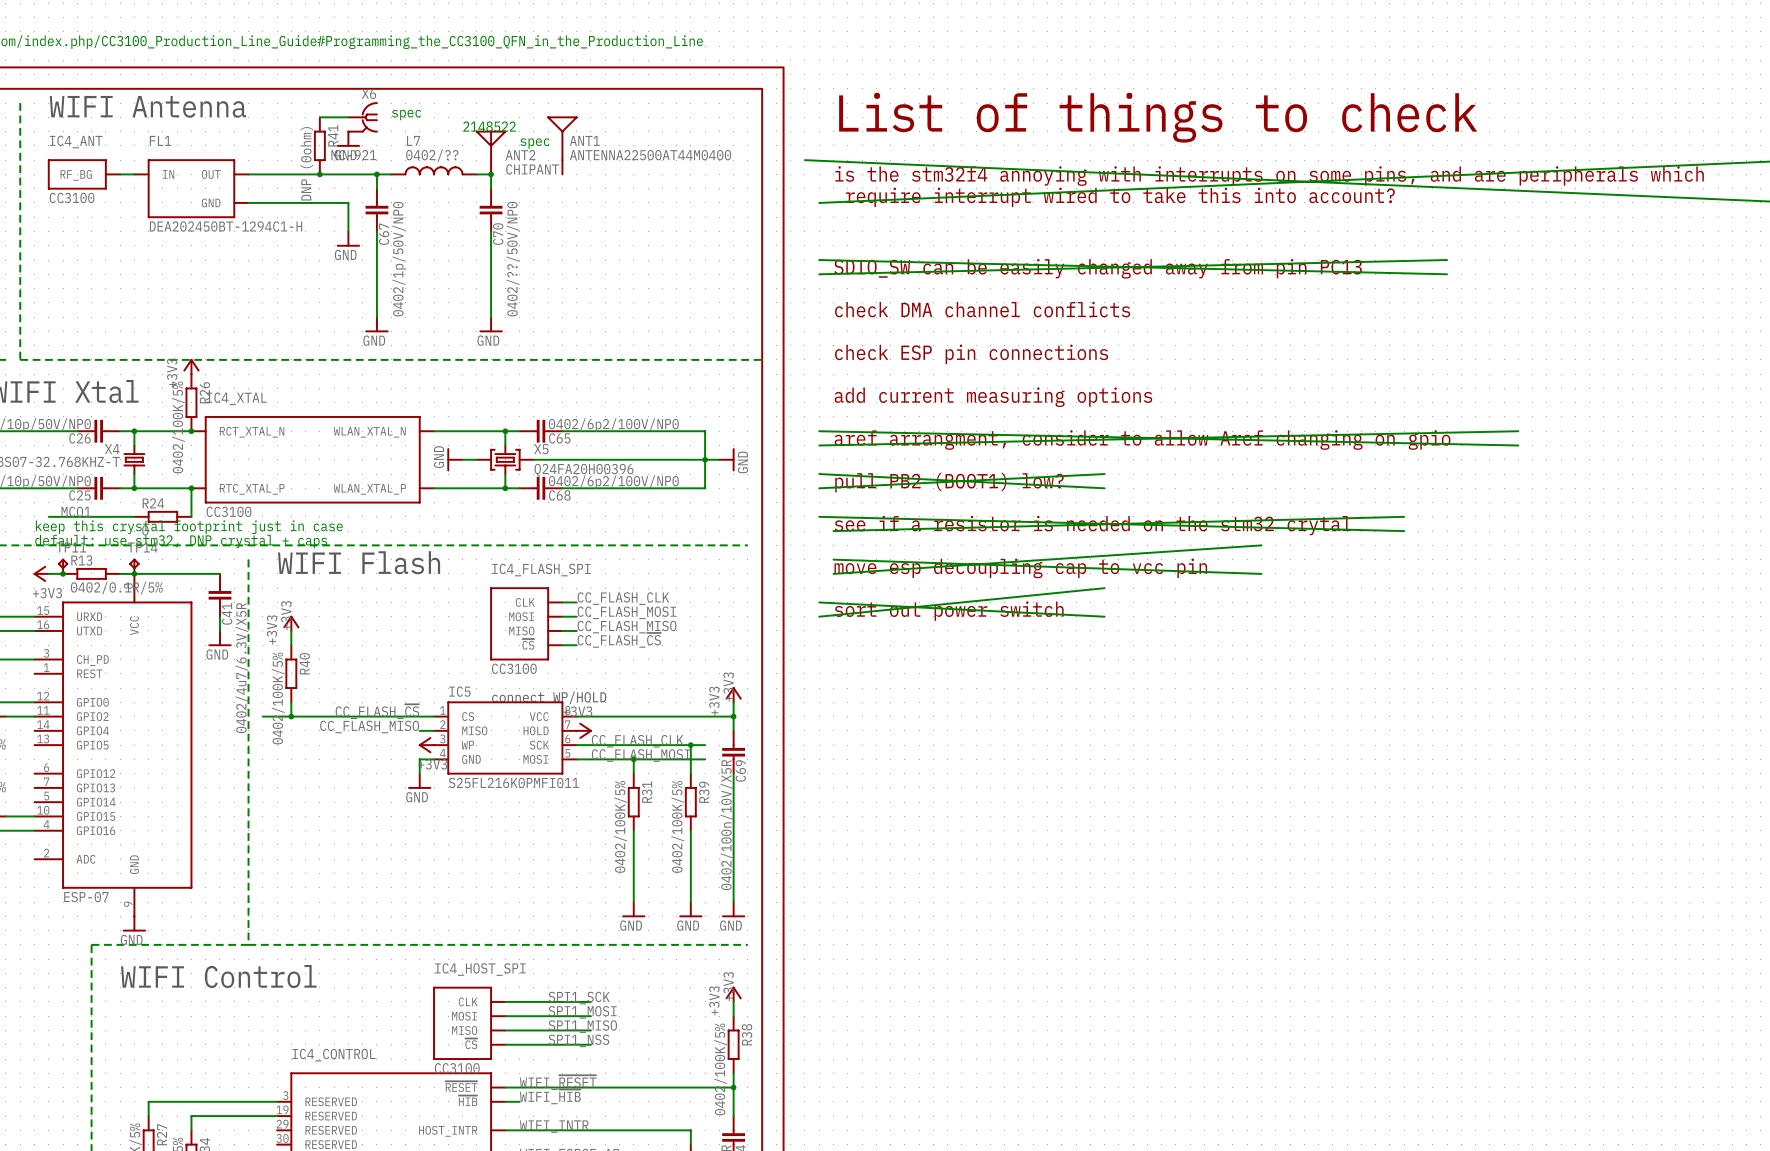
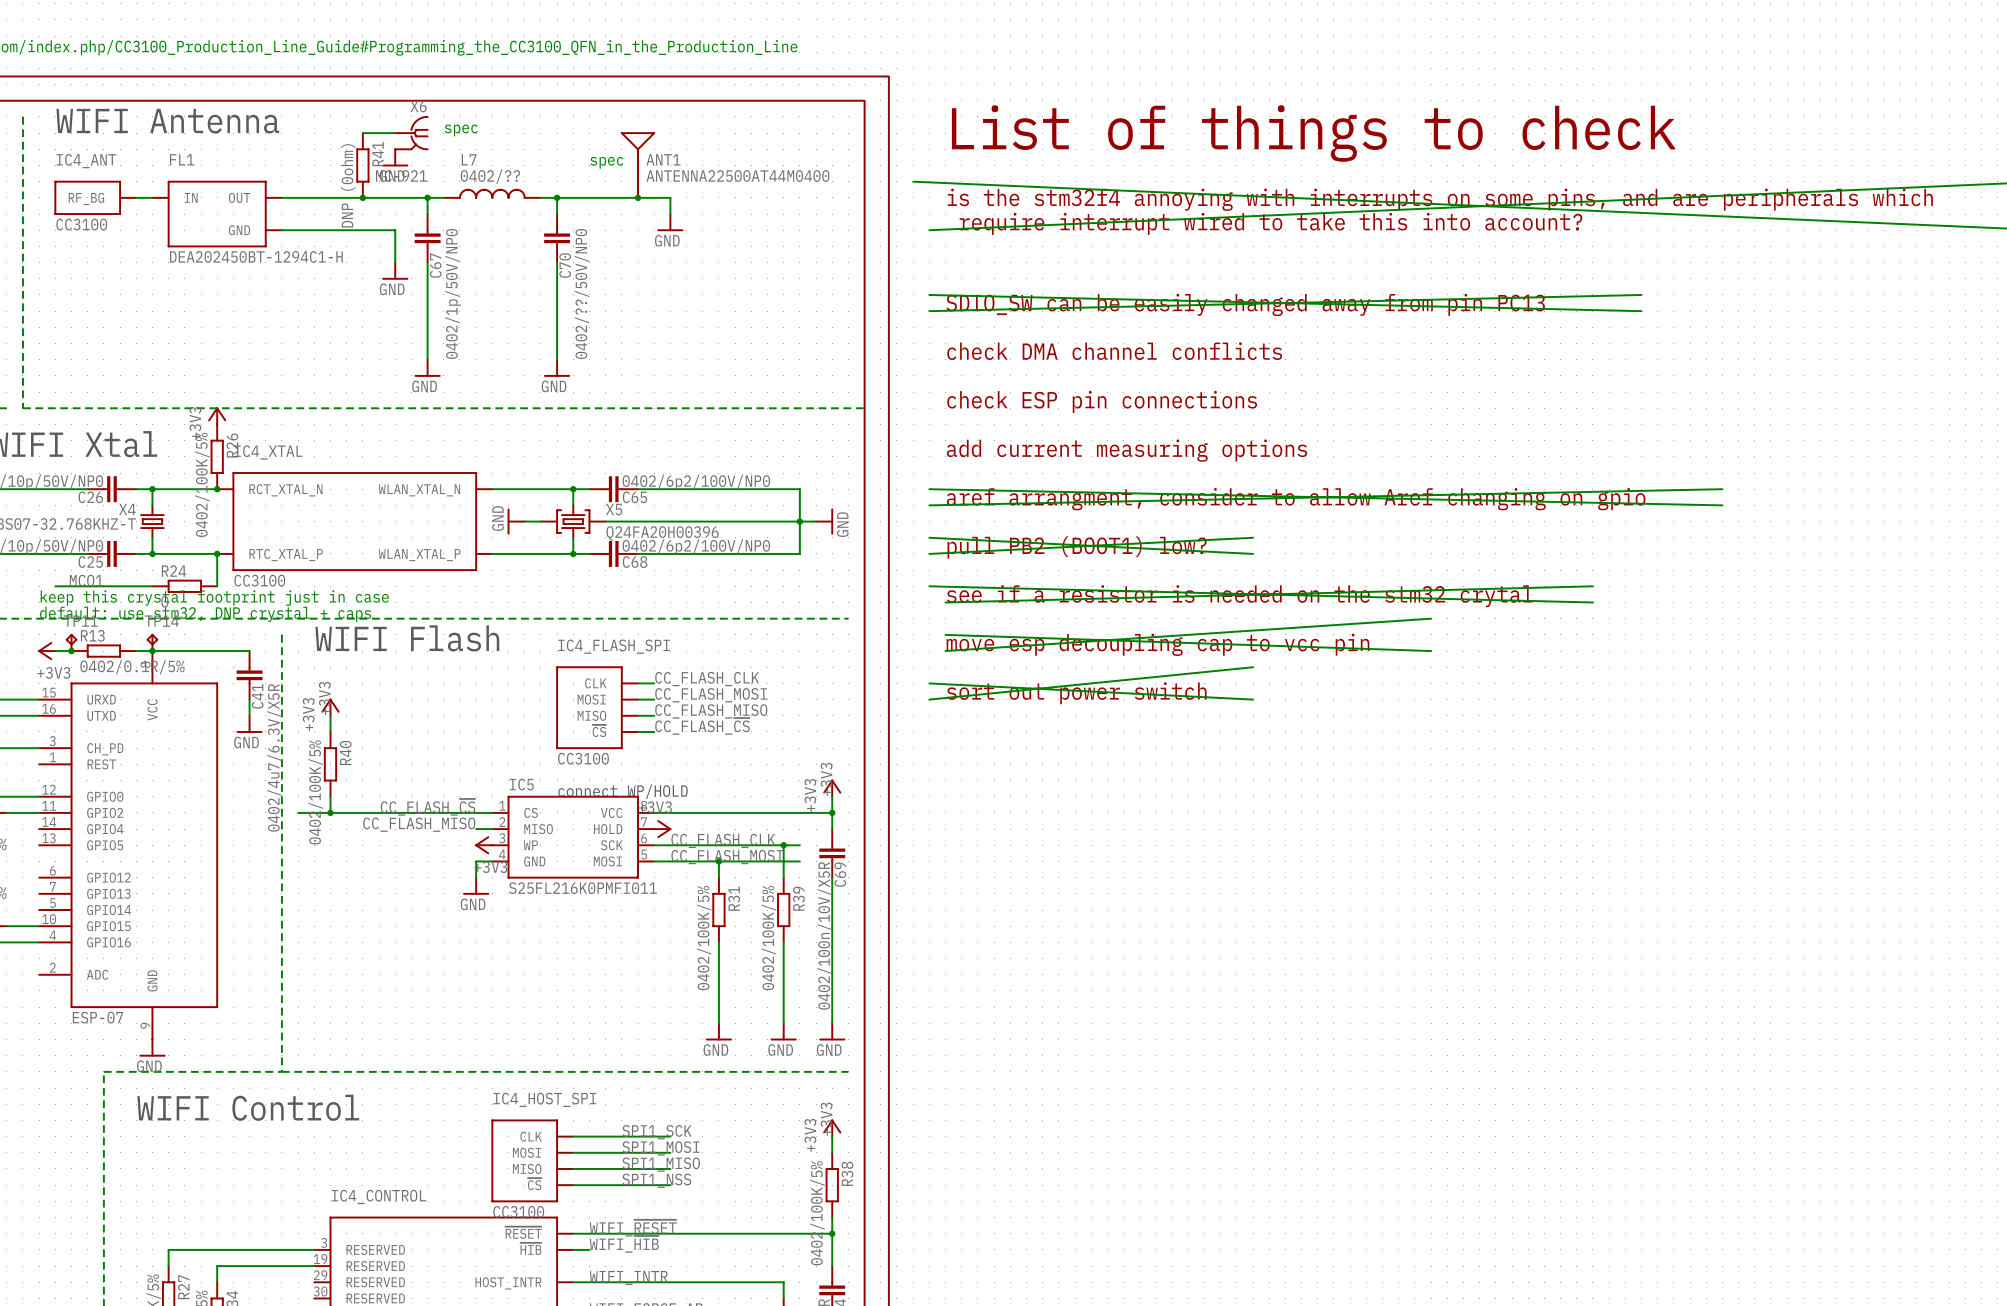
text: 2148522 (489, 126) -> none
ANT2: CHIPANT (491, 152) -> none
wire: none -> (557, 197) (670, 197) (670, 214)
junction: none -> (638, 197)
power symbol: none -> GND (670, 222)

